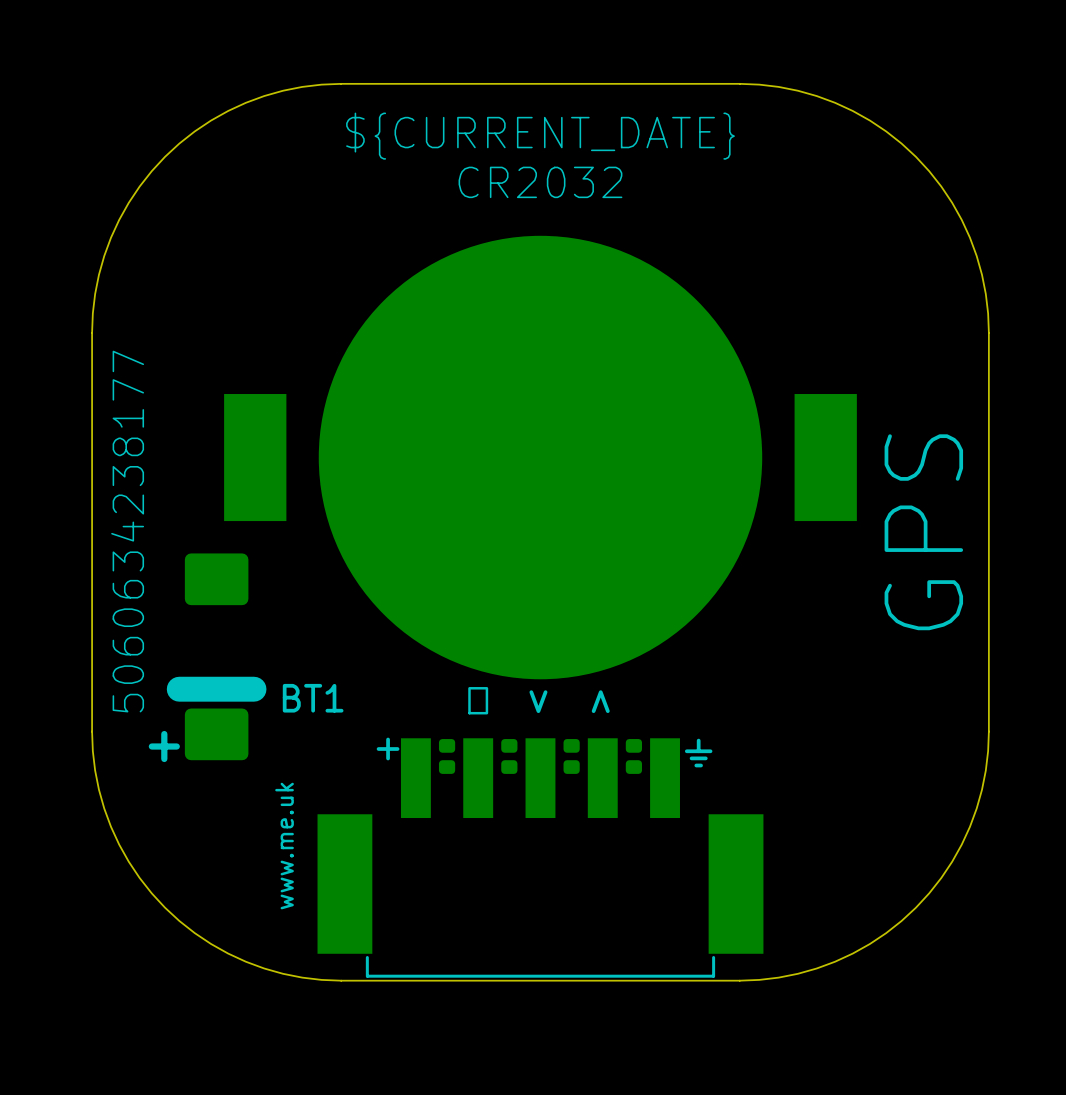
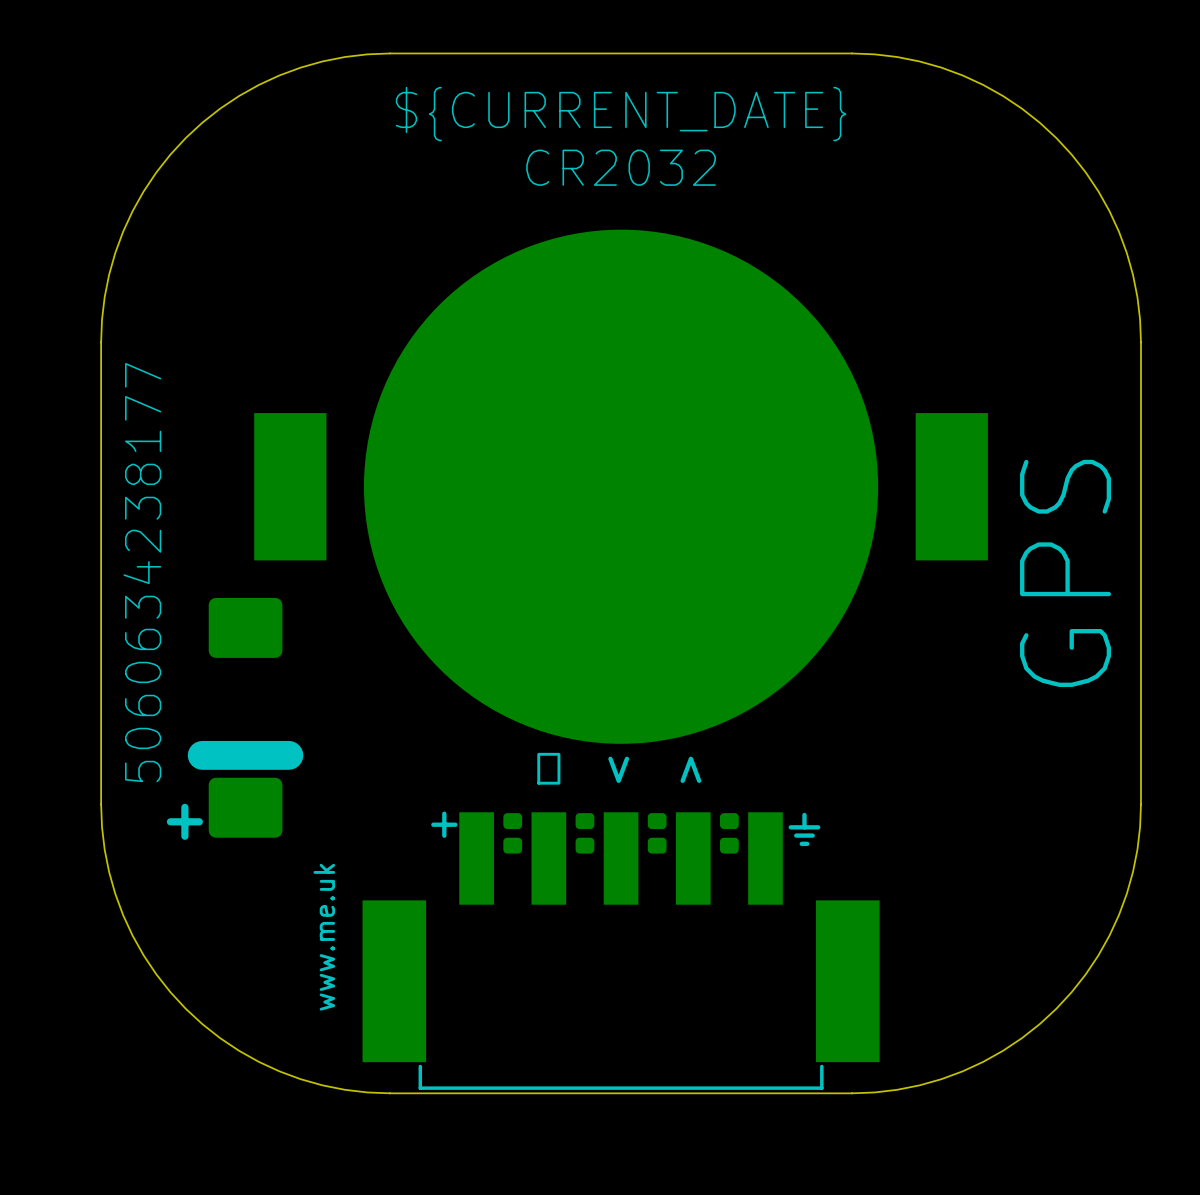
BT1 name: BT1 (313, 698) -> none

